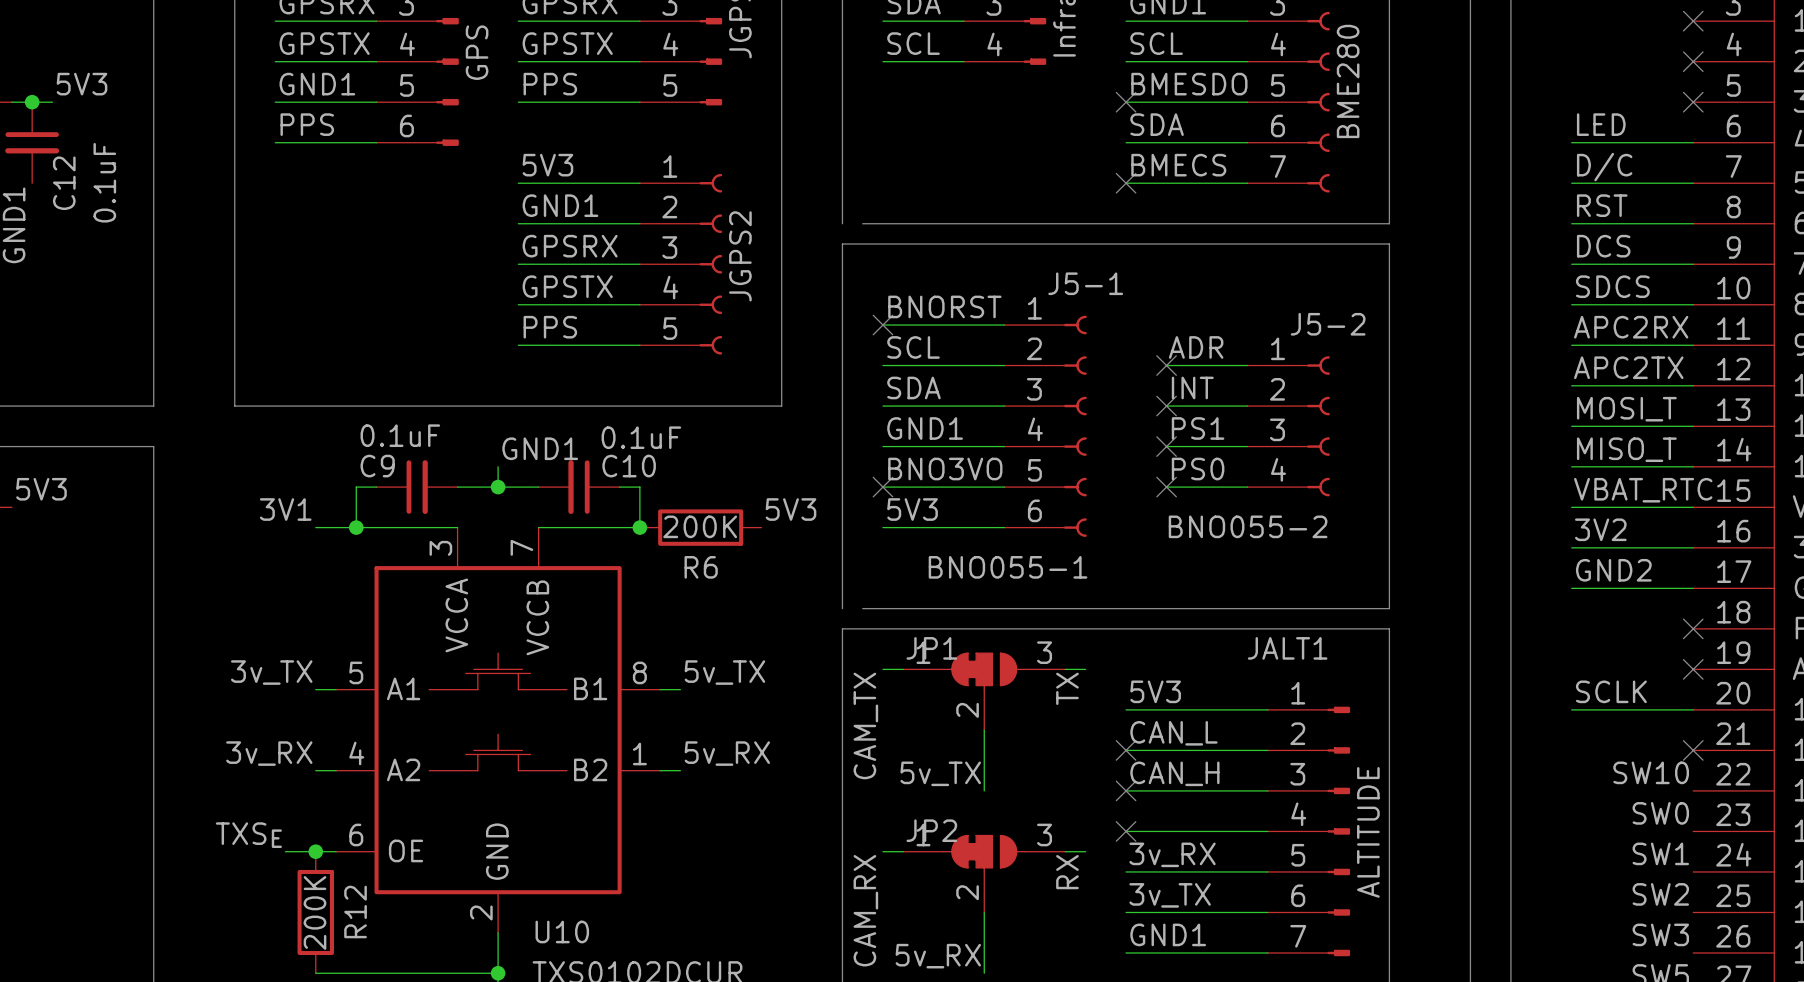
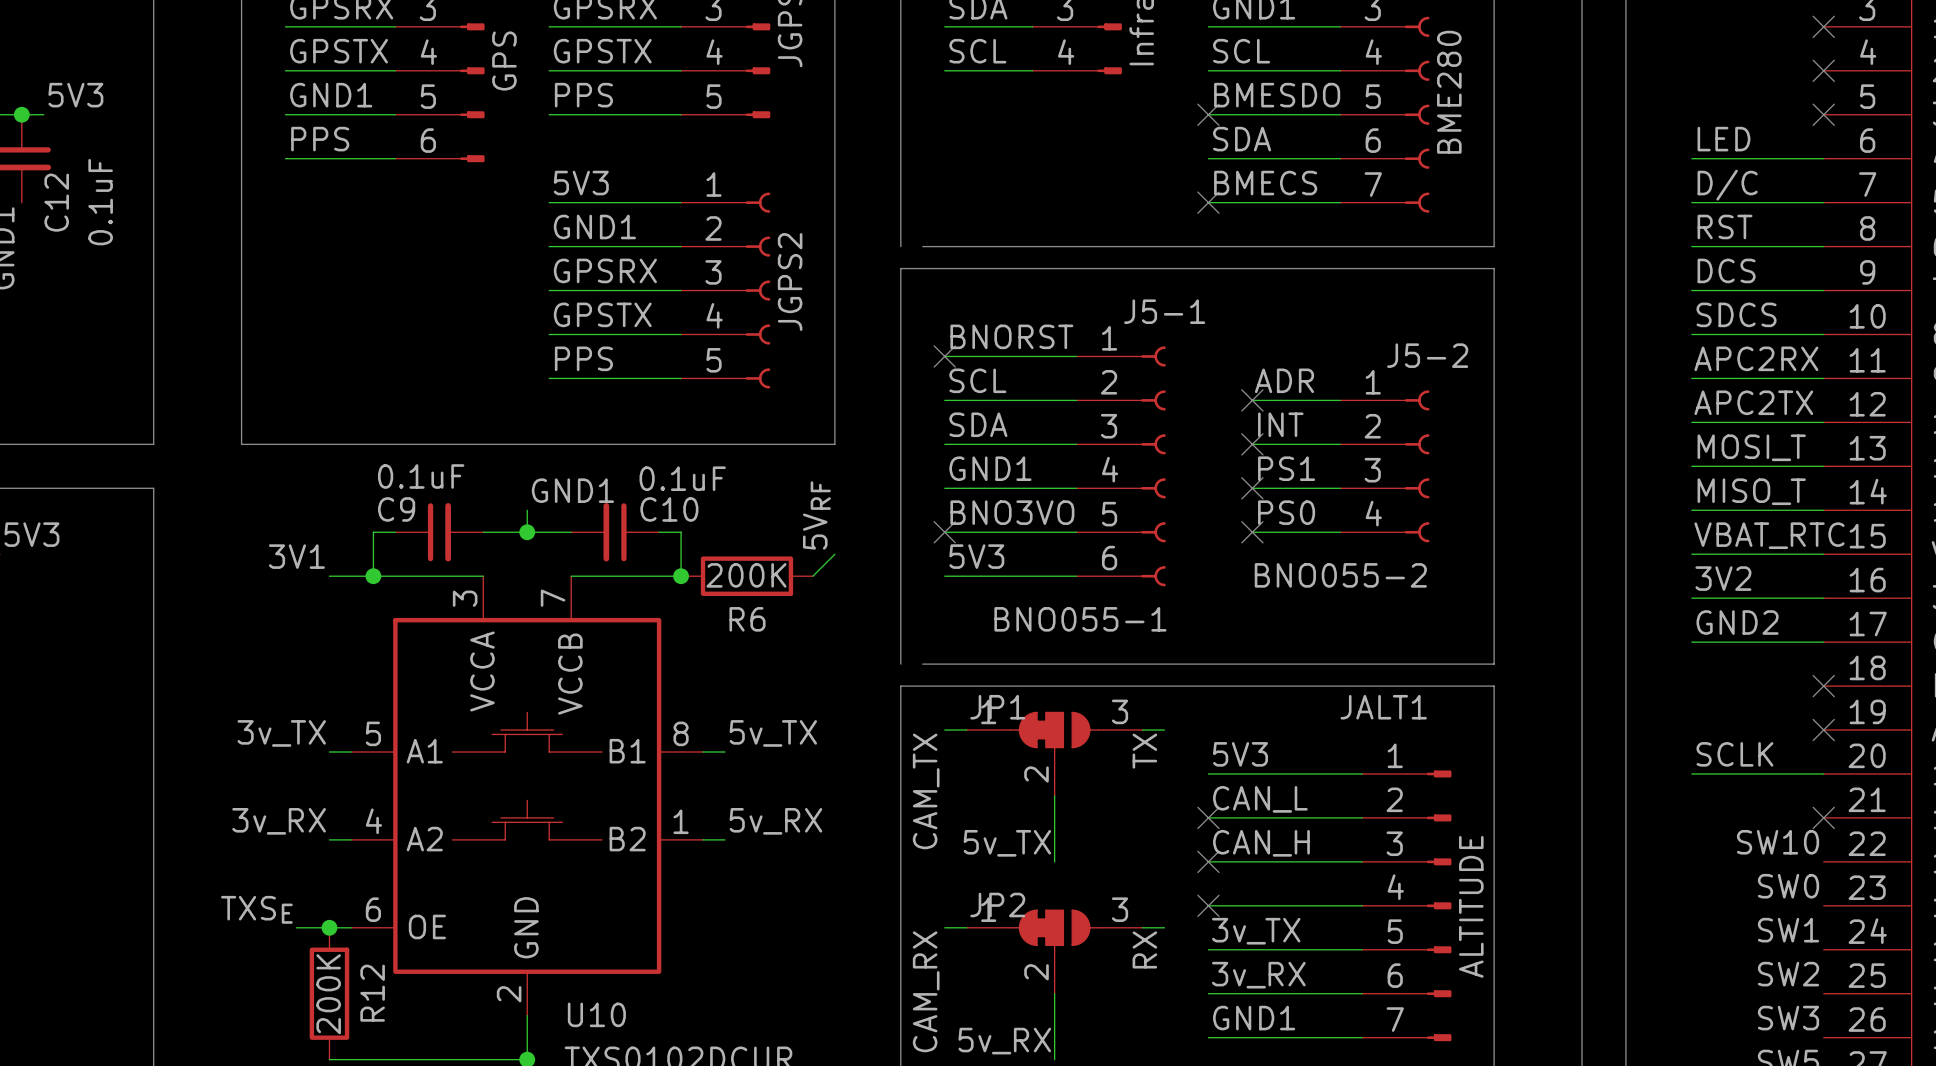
label: none -> 5VRF (816, 515)
wire: none -> (834, 554) (812, 576)
label: 5V3 (791, 509) -> none
label: 3v_RX (1172, 854) -> 3v_TX (1256, 931)
label: 3v_TX (1170, 895) -> 3v_RX (1258, 975)

